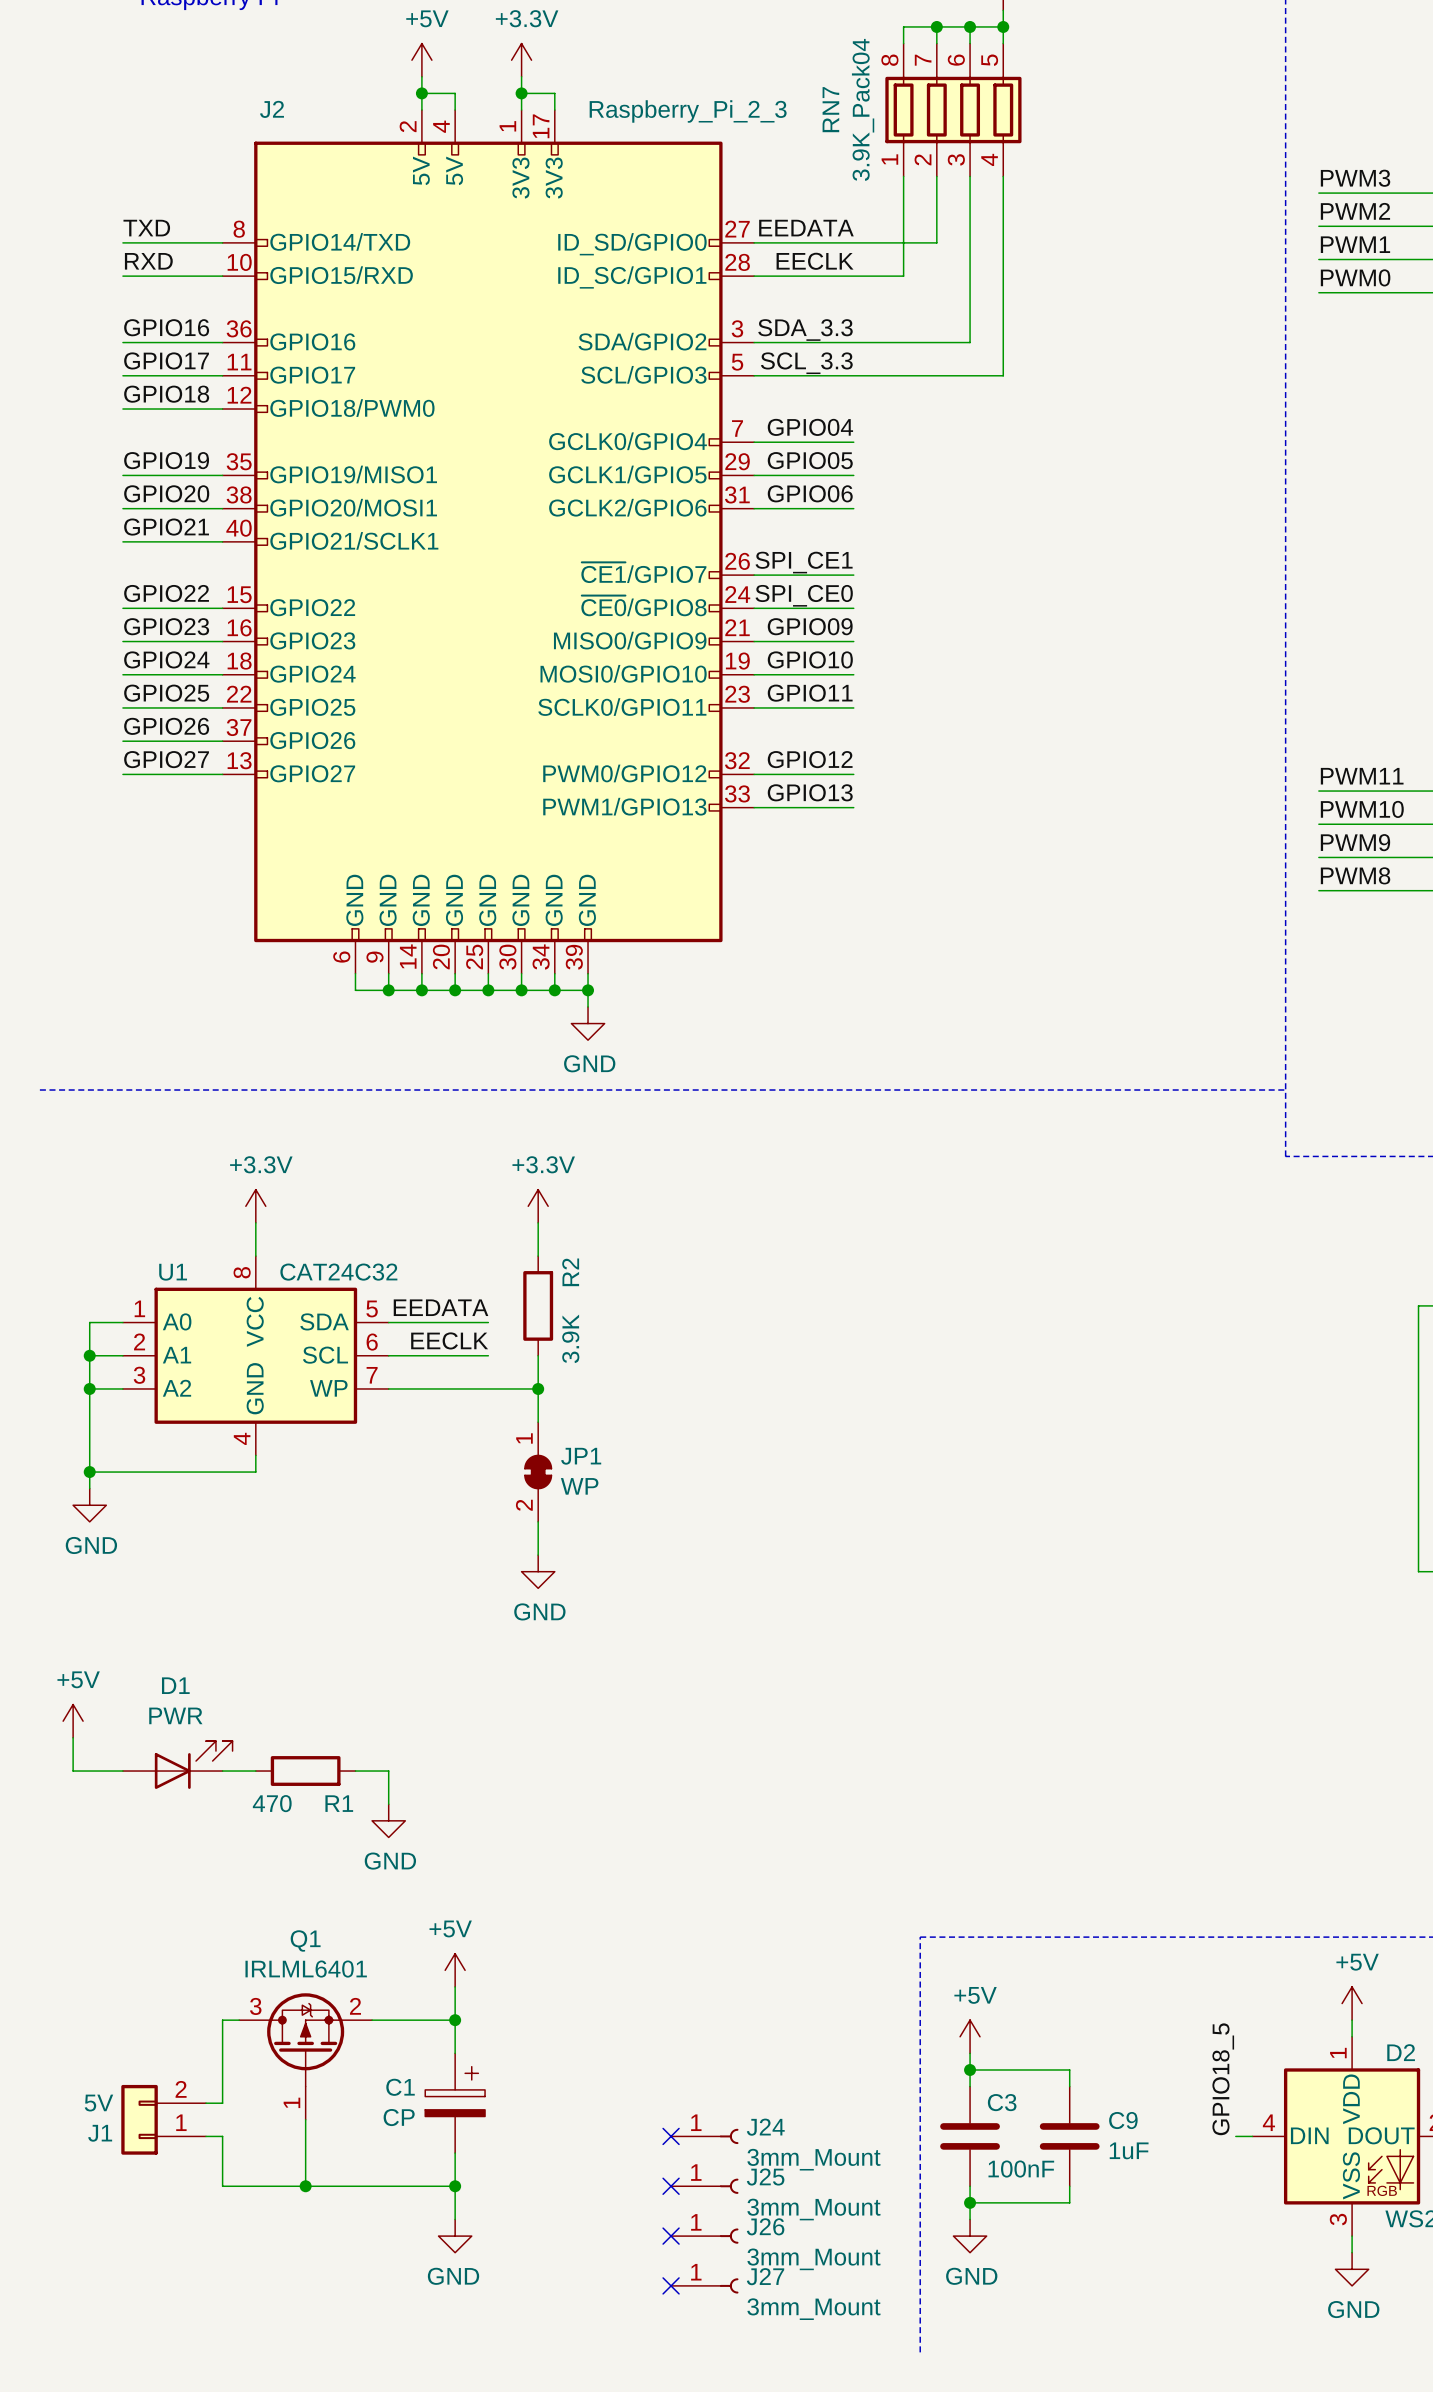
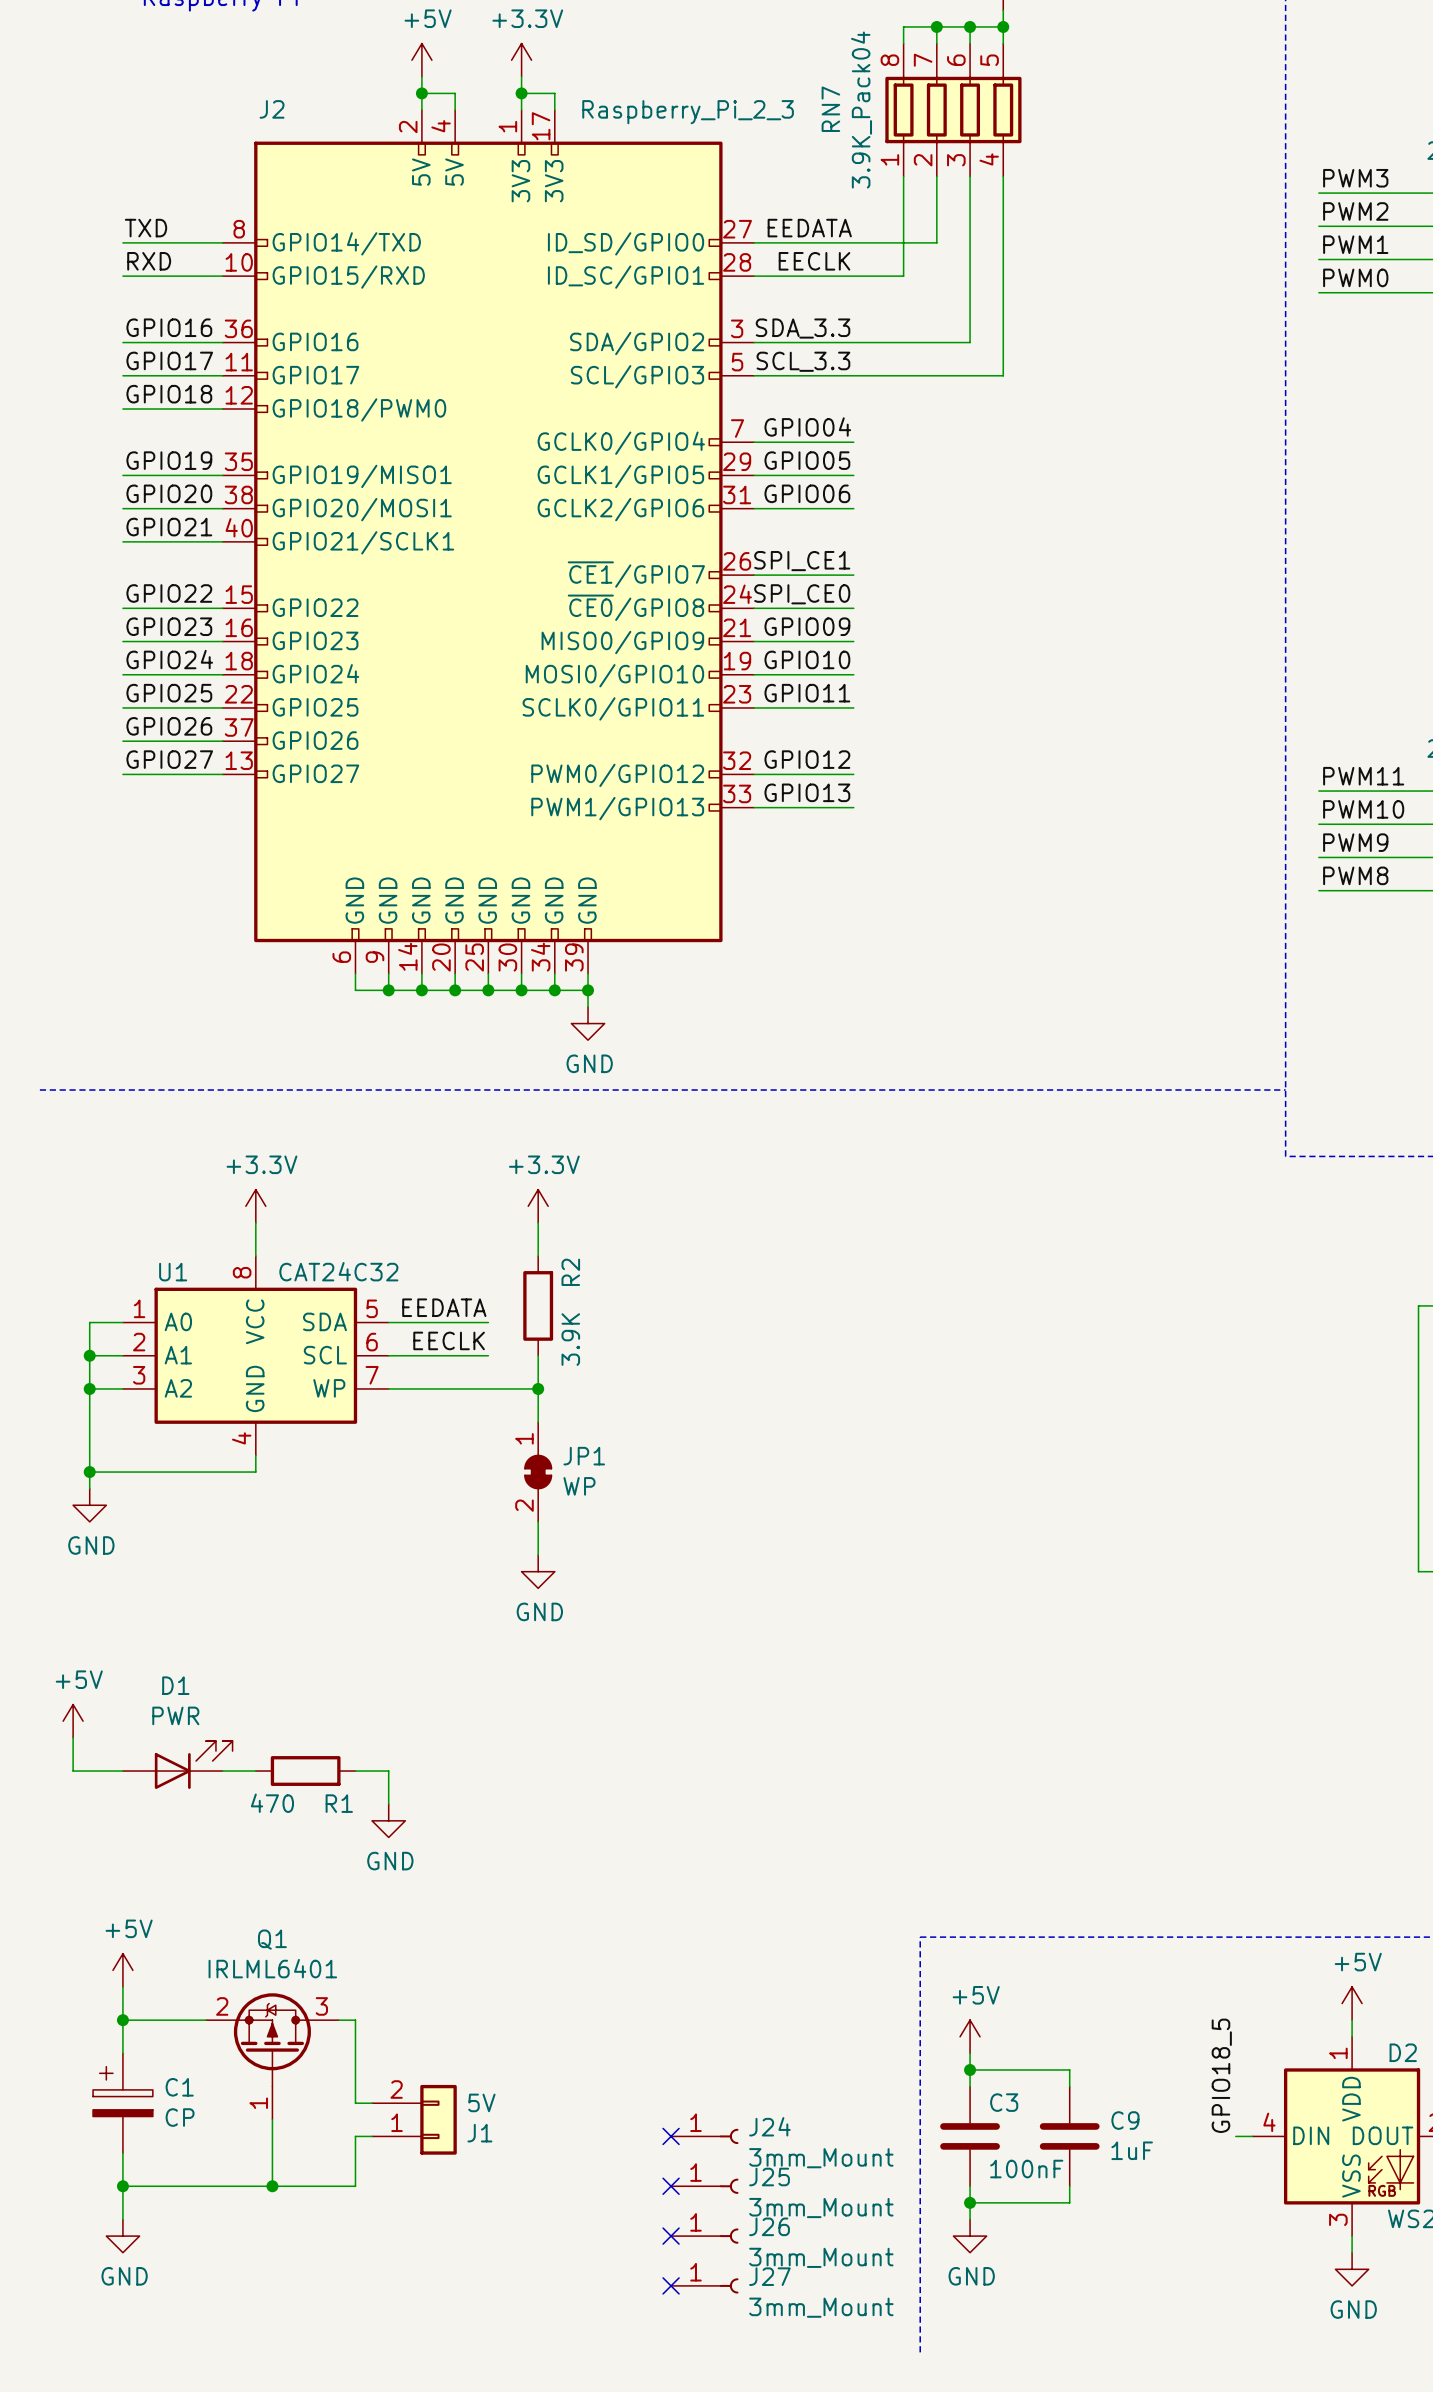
power symbol: none -> +5V (122, 1970)
power symbol: +5V (455, 1970) -> none
wire: none -> (122, 1986) (122, 2053)
wire: (455, 1986) (455, 2053) -> none
junction: none -> (122, 2020)
wire: (239, 2020) (222, 2020) (222, 2103) (205, 2103) -> none
wire: none -> (338, 2020) (355, 2020) (355, 2103) (372, 2103)
wire: (372, 2020) (455, 2020) -> (122, 2020) (205, 2020)
junction: (455, 2020) -> none
Q1 flip: as is (305, 2039) -> left-right (272, 2039)
C1 flip: as is (455, 2091) -> left-right (122, 2091)
C1 position: (455, 2103) -> (122, 2103)
J1 flip: as is (139, 2119) -> left-right (438, 2119)
J1 position: (163, 2119) -> (414, 2119)
wire: (305, 2119) (305, 2186) -> (272, 2119) (272, 2186)
wire: (205, 2136) (222, 2136) (222, 2186) -> (122, 2186) (222, 2186)
wire: none -> (122, 2153) (122, 2219)
wire: (455, 2153) (455, 2219) -> none
junction: none -> (122, 2186)
junction position: (305, 2186) -> (272, 2186)
wire: (355, 2186) (455, 2186) -> (355, 2186) (355, 2136) (372, 2136)
junction: (455, 2186) -> none
power symbol: none -> GND (122, 2236)
power symbol: GND (455, 2236) -> none

